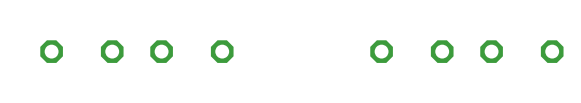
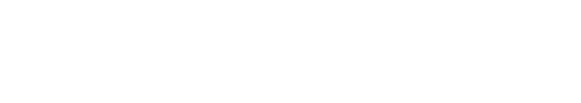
part: (81, 51) -> none
part: (191, 51) -> none
part: (411, 51) -> none
part: (521, 51) -> none

